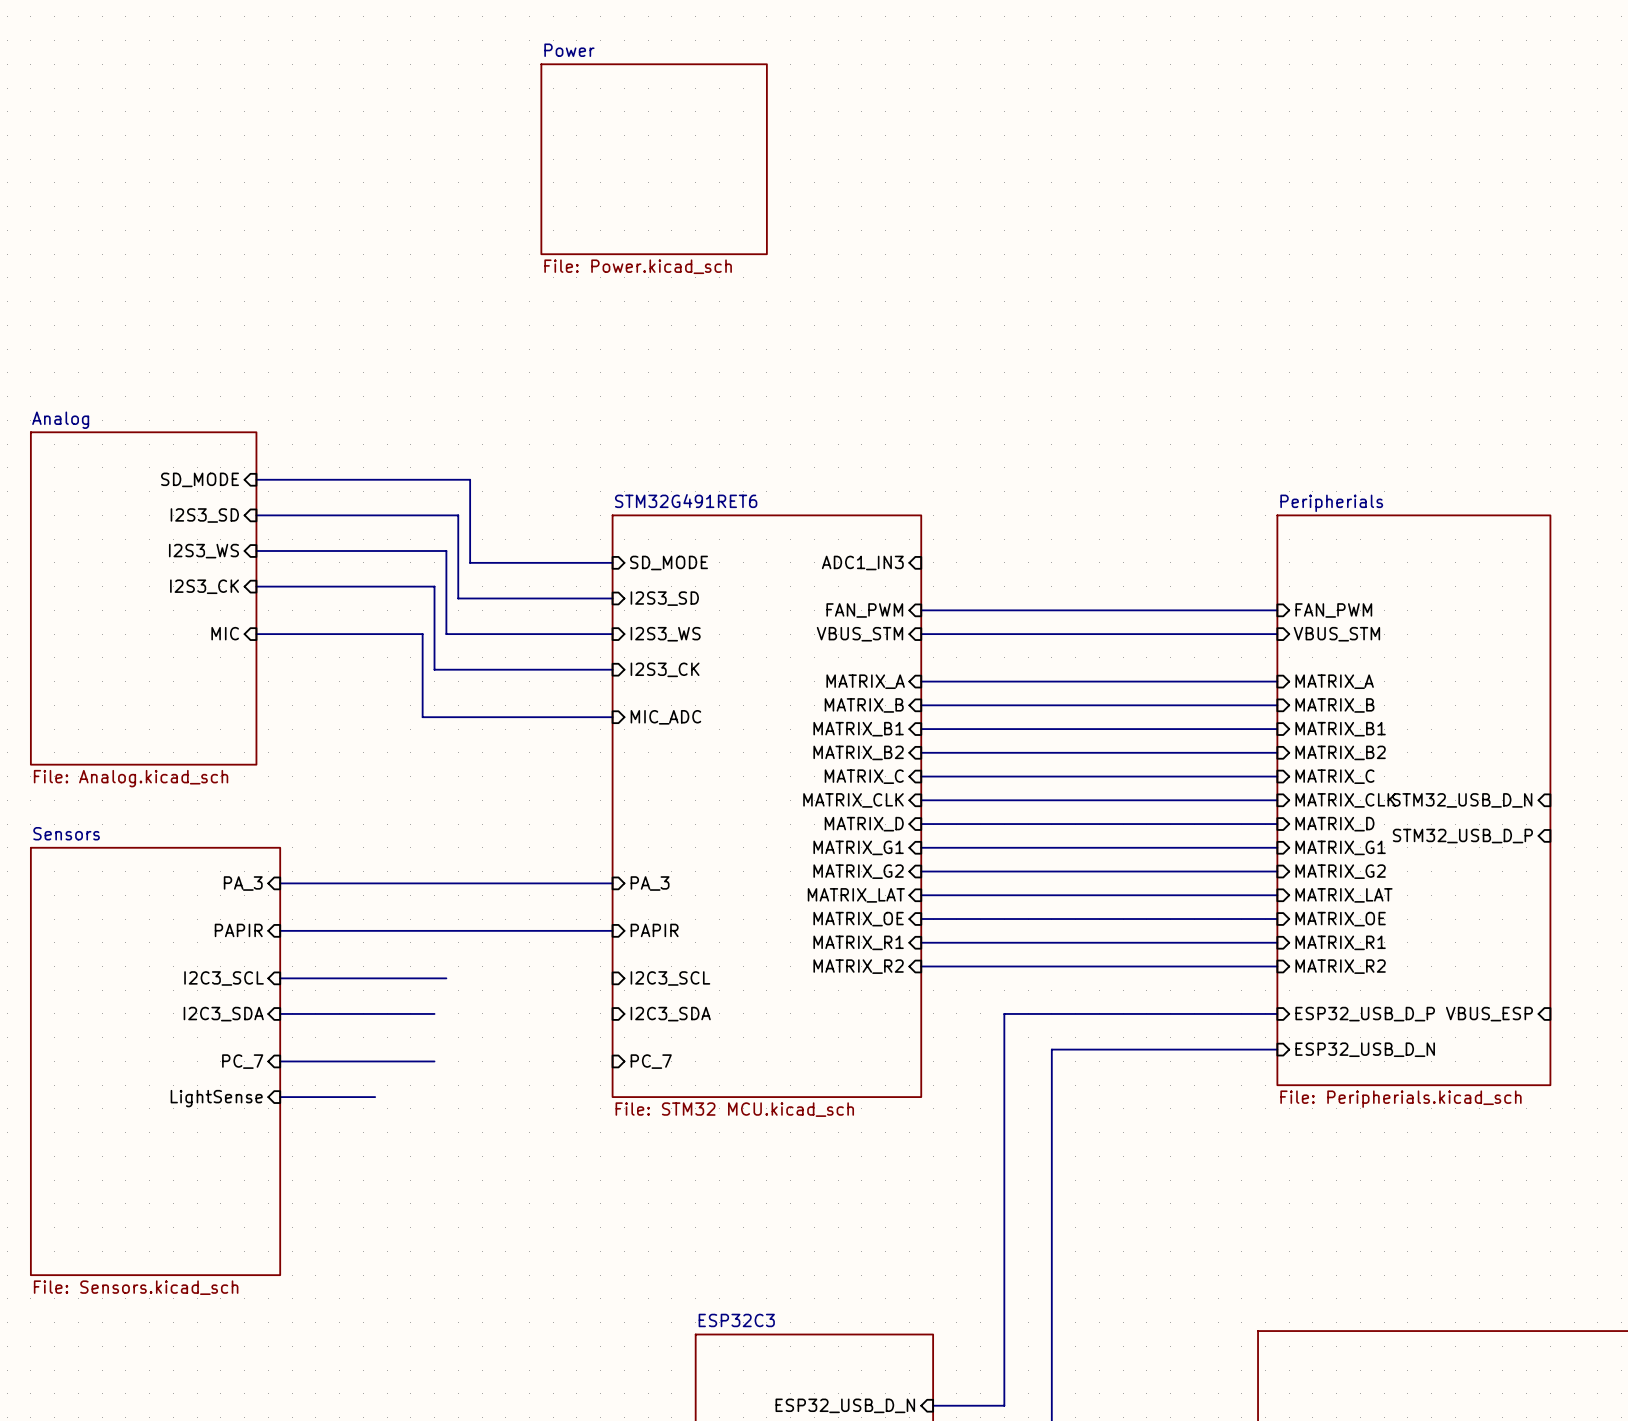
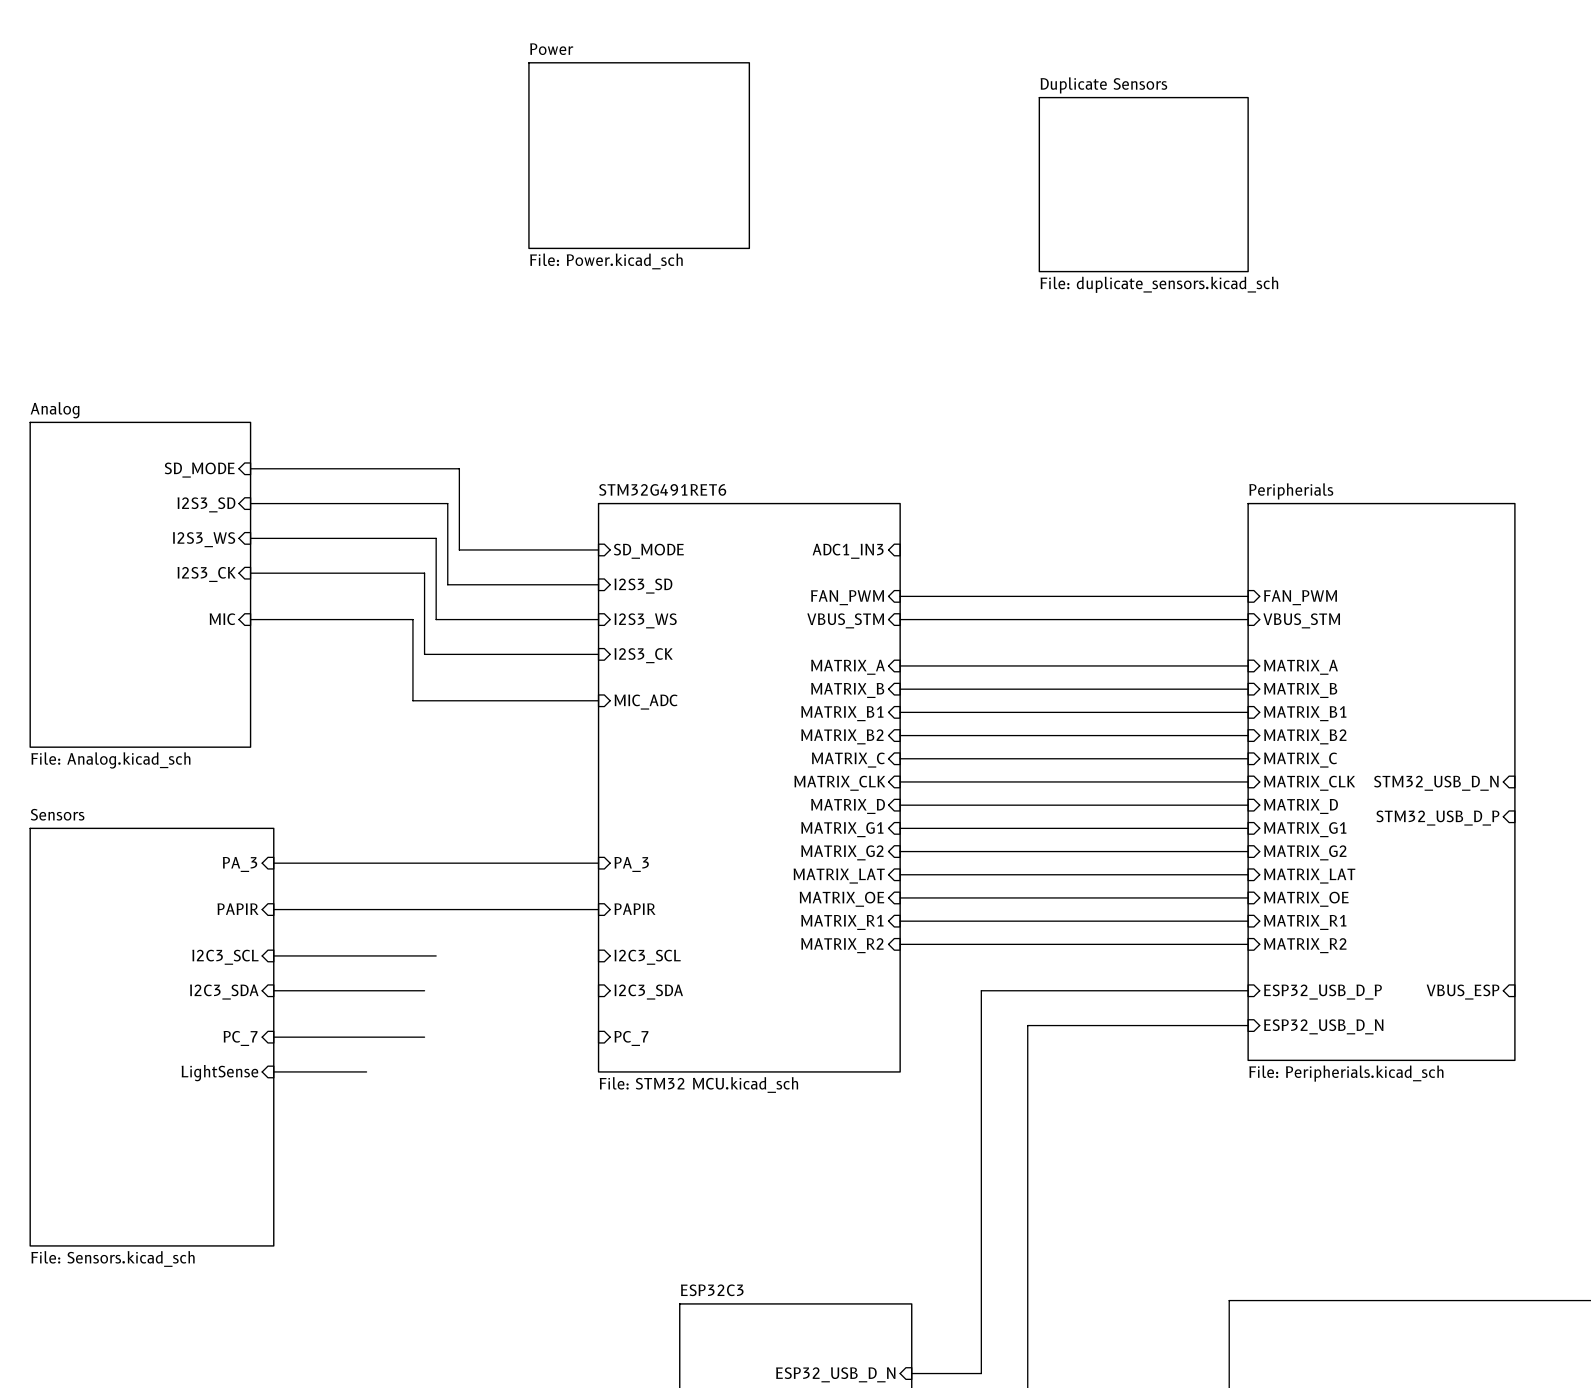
sheet Duplicate Sensors: none -> File: duplicate_sensors.kicad_sch (1143, 184)

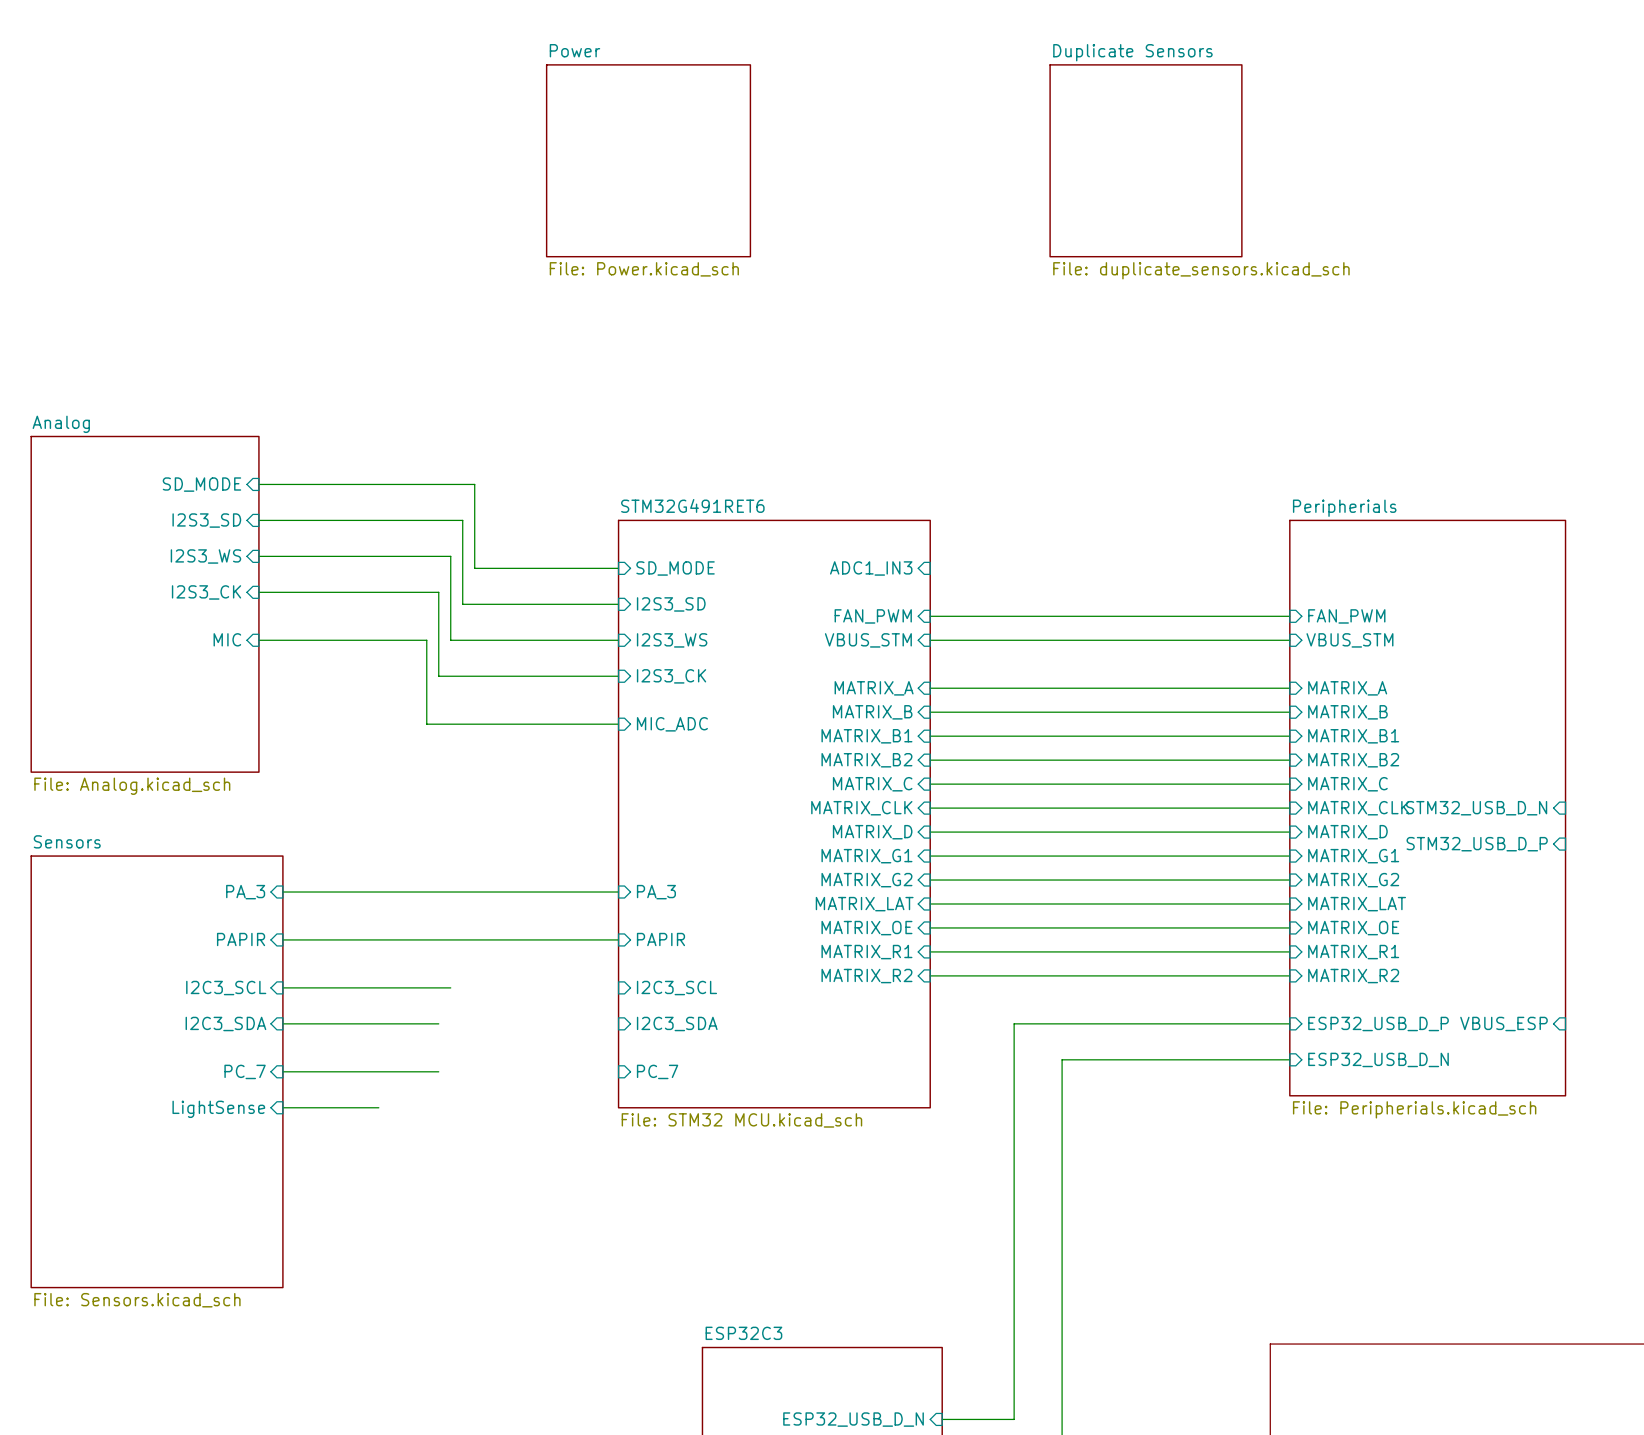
sheet Power: none -> File: Power.kicad_sch (648, 160)
sheet Power: File: Power.kicad_sch (639, 155) -> none
sheet Duplicate Sensors: none -> File: duplicate_sensors.kicad_sch (1145, 160)
sheet Duplicate Sensors: File: duplicate_sensors.kicad_sch (1143, 184) -> none

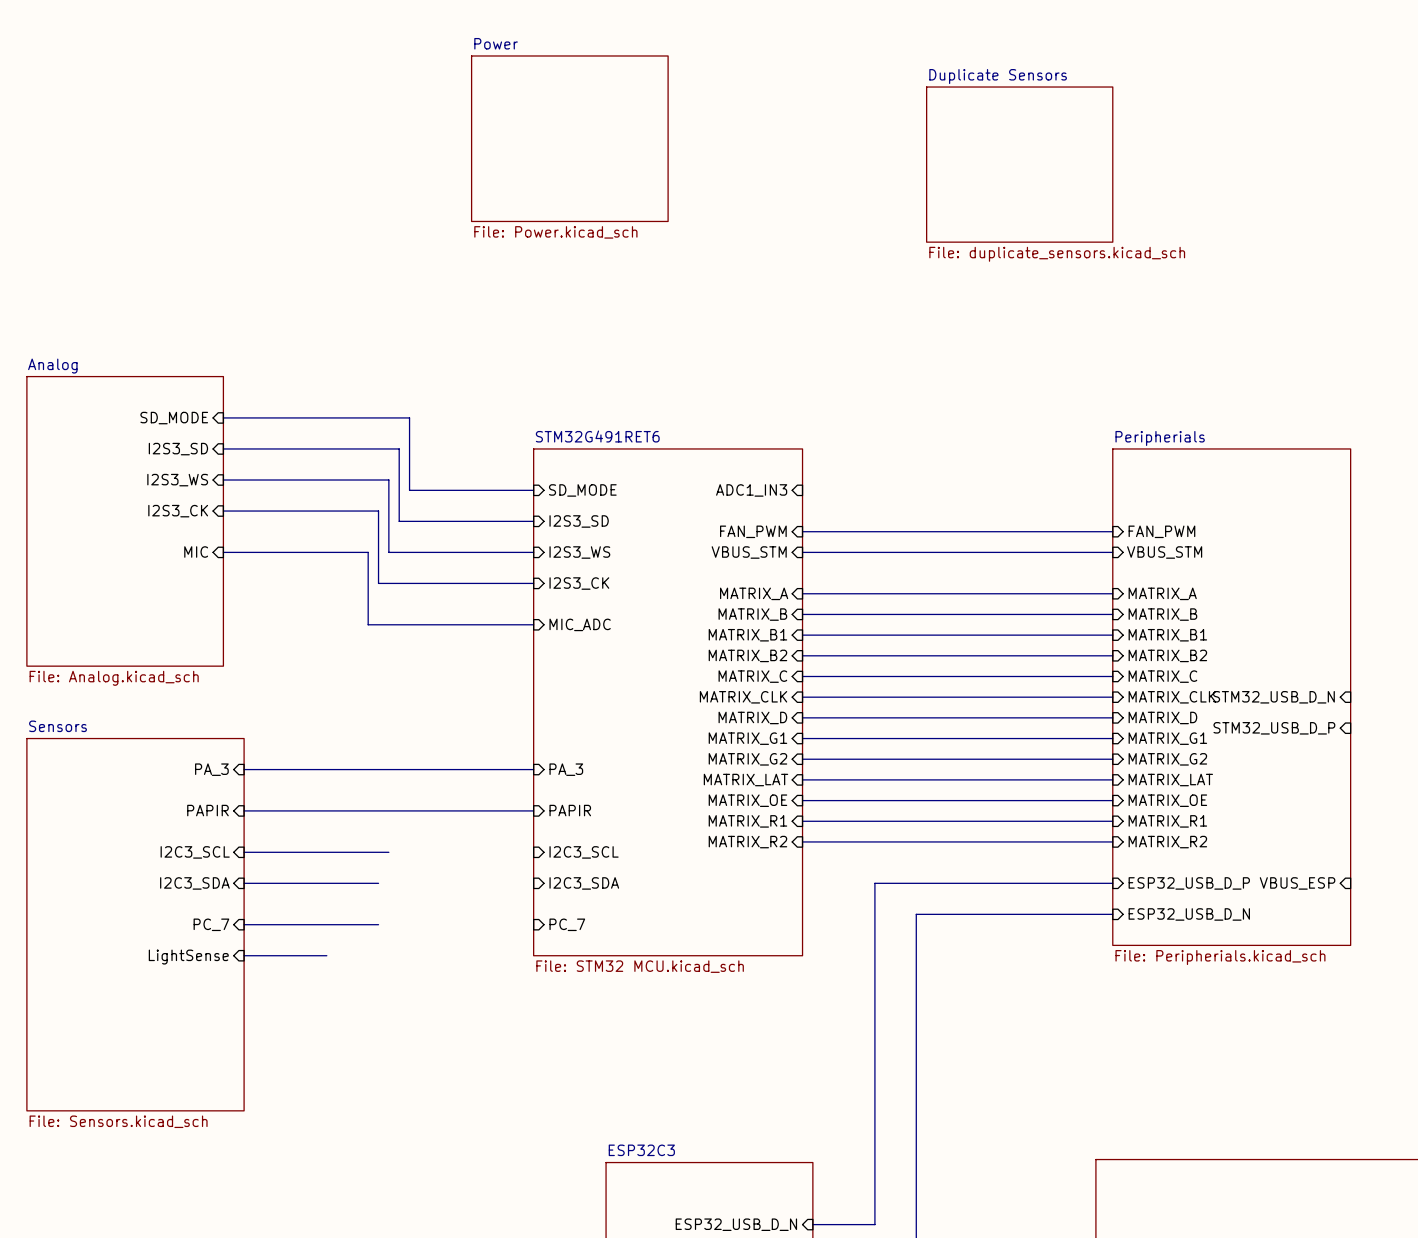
sheet Power: File: Power.kicad_sch (648, 160) -> none
sheet Power: none -> File: Power.kicad_sch (569, 138)
sheet Duplicate Sensors: File: duplicate_sensors.kicad_sch (1145, 160) -> none
sheet Duplicate Sensors: none -> File: duplicate_sensors.kicad_sch (1019, 164)

